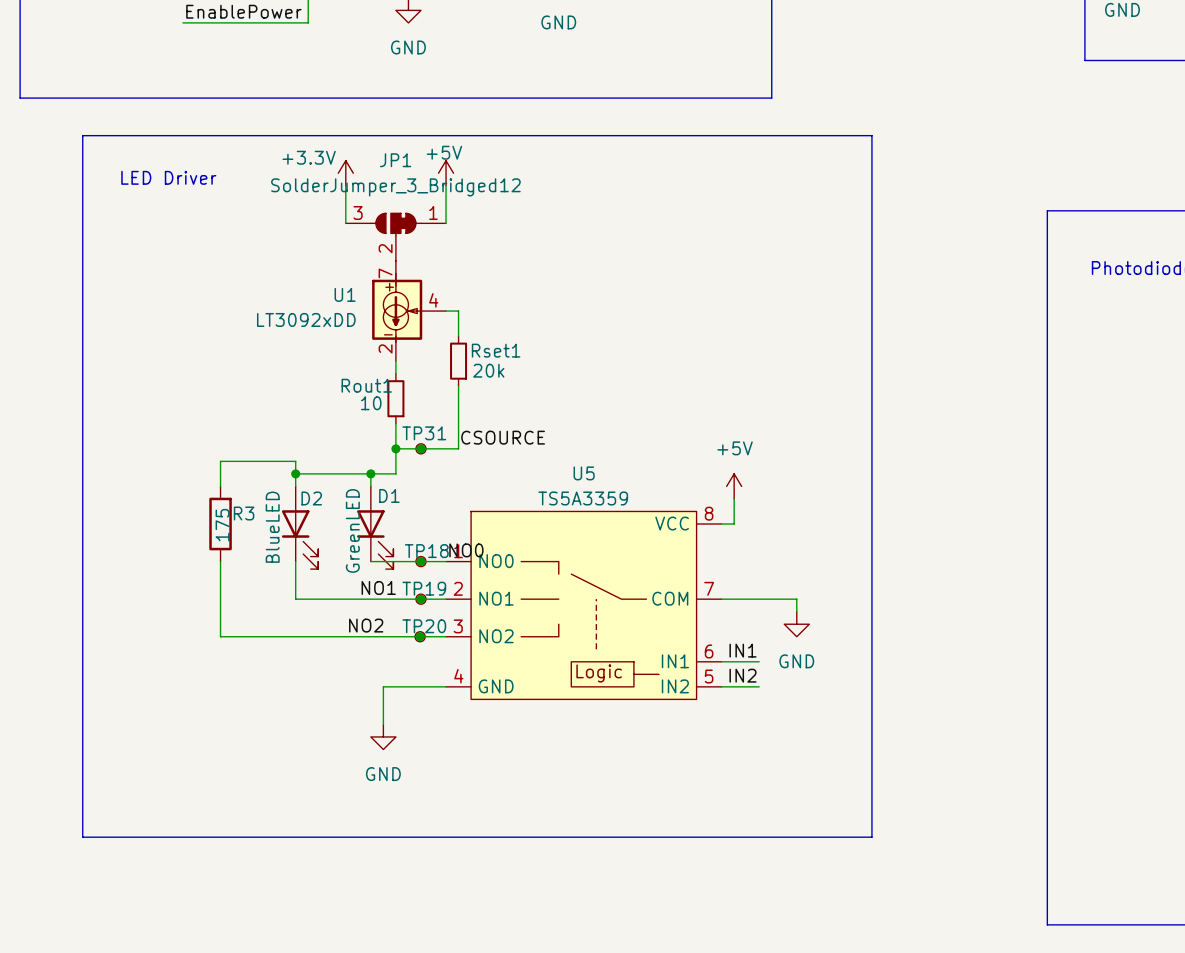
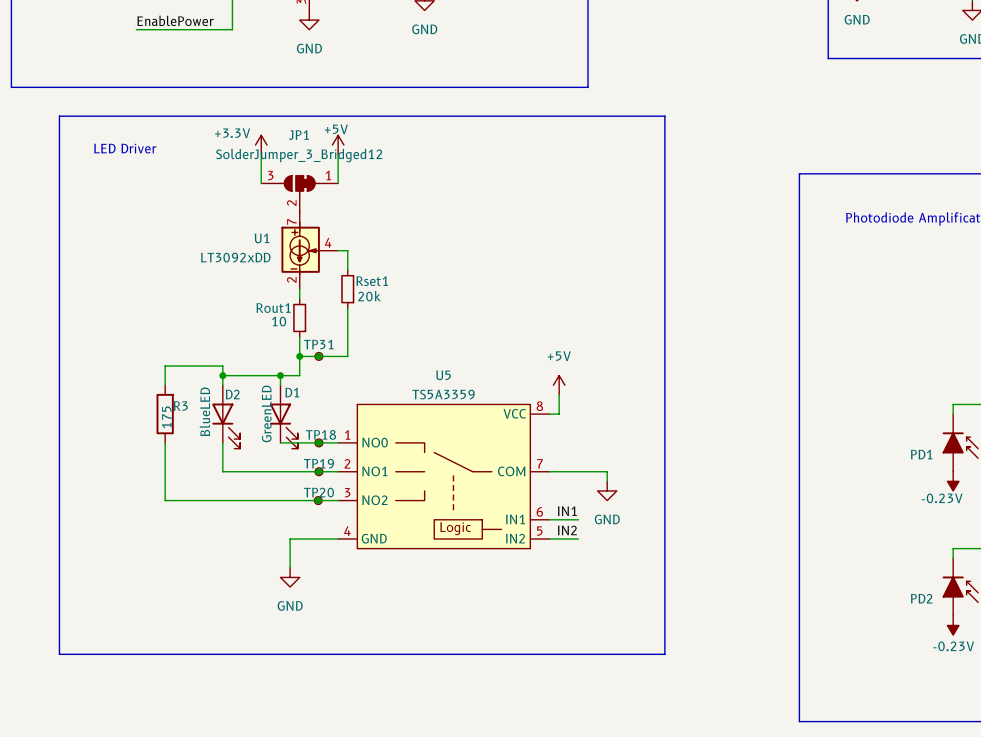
label: CSOURCE (503, 437) -> none
label: NO0 (466, 550) -> none
label: NO1 (378, 587) -> none
label: NO2 (366, 625) -> none

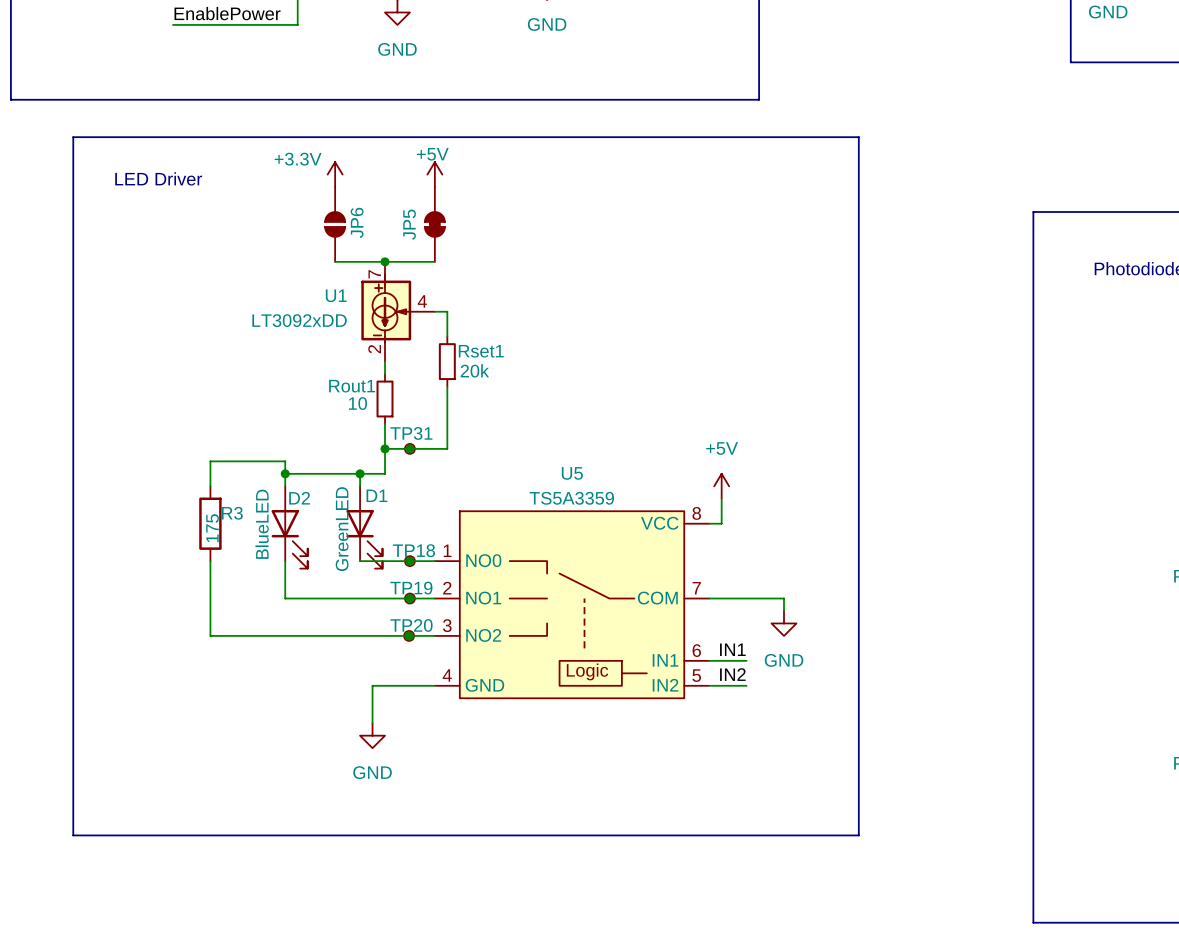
JP6: none -> (335, 224)
JP5: none -> (434, 224)
JP1: SolderJumper_3_Bridged12 (299, 194) -> none
wire: none -> (335, 261) (434, 261)
junction: none -> (384, 261)

